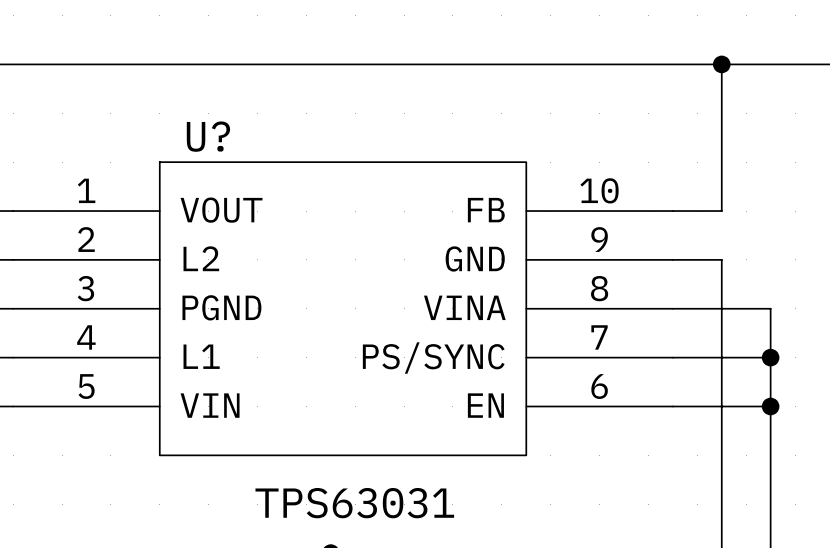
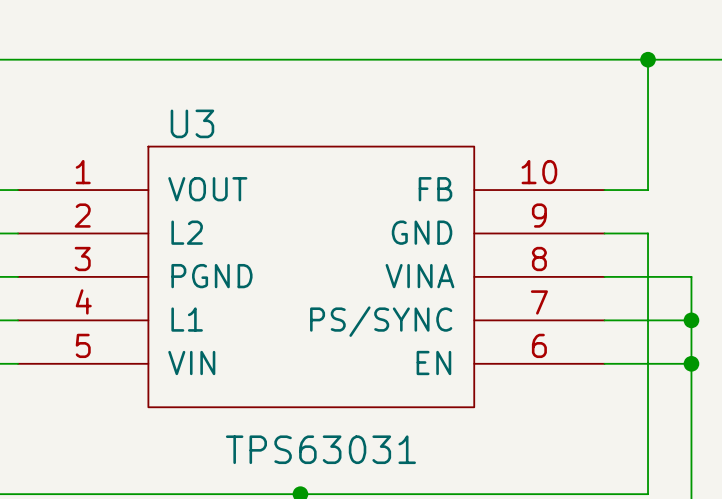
U? name: U? (208, 136) -> U3 (192, 123)

